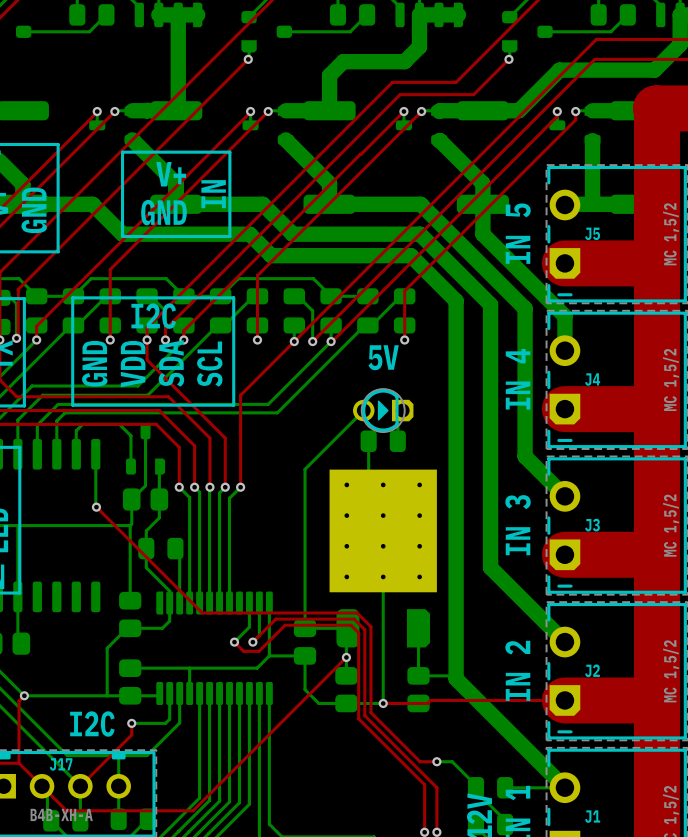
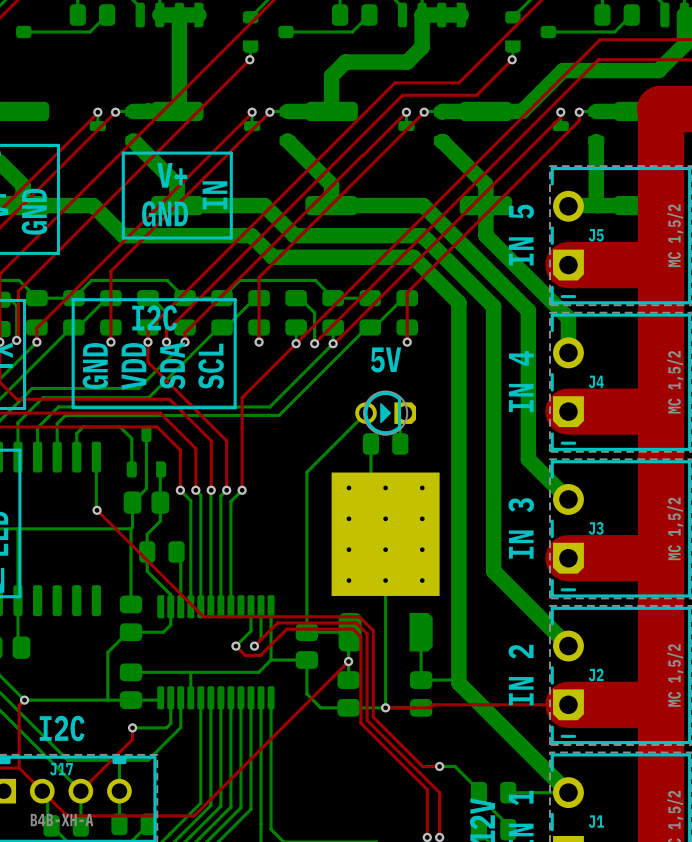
text position: I2C (92, 724) -> I2C (62, 728)

